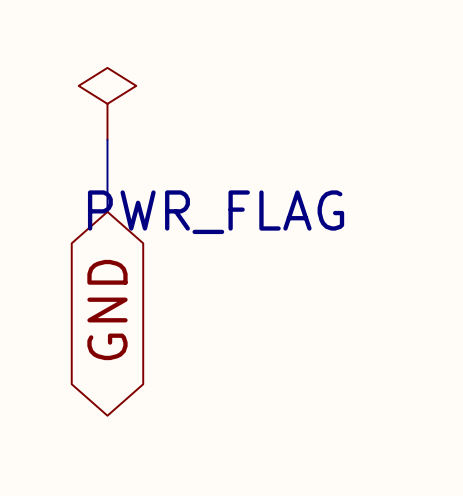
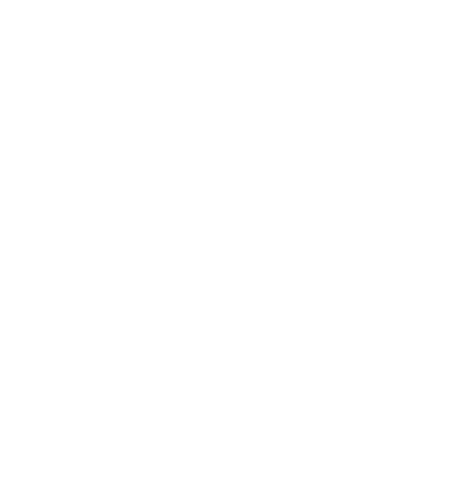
power symbol: PWR_FLAG (107, 103) -> none
wire: (107, 139) (107, 211) -> none
global label: GND (107, 310) -> none

